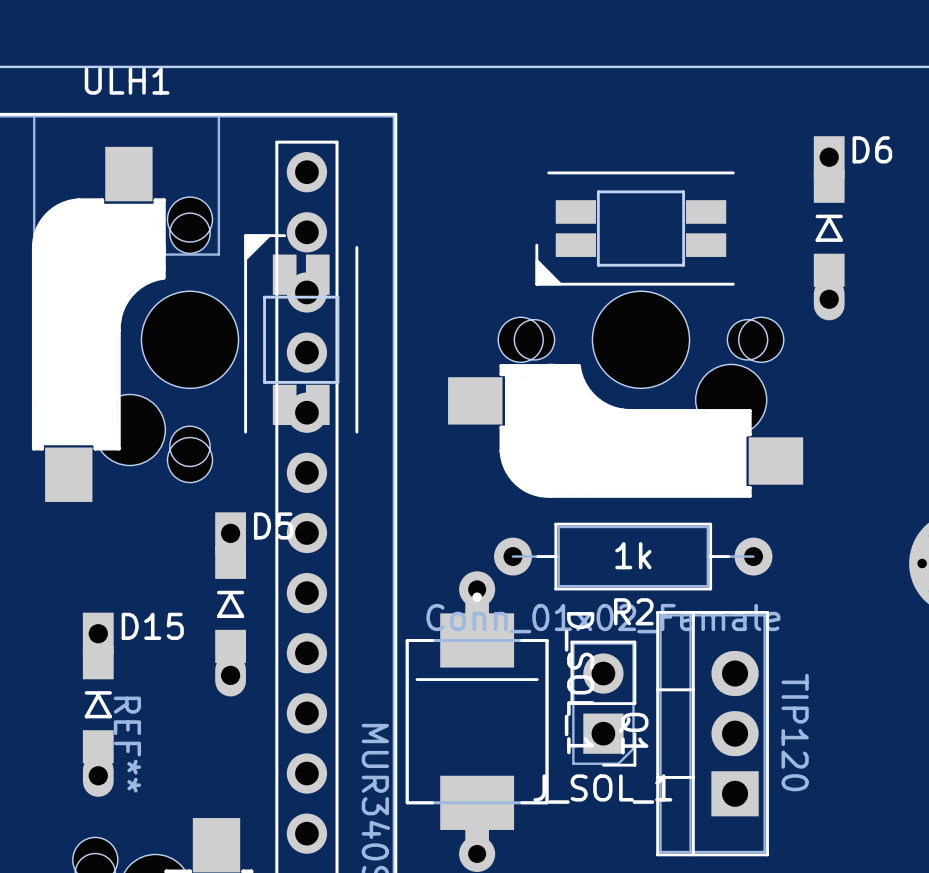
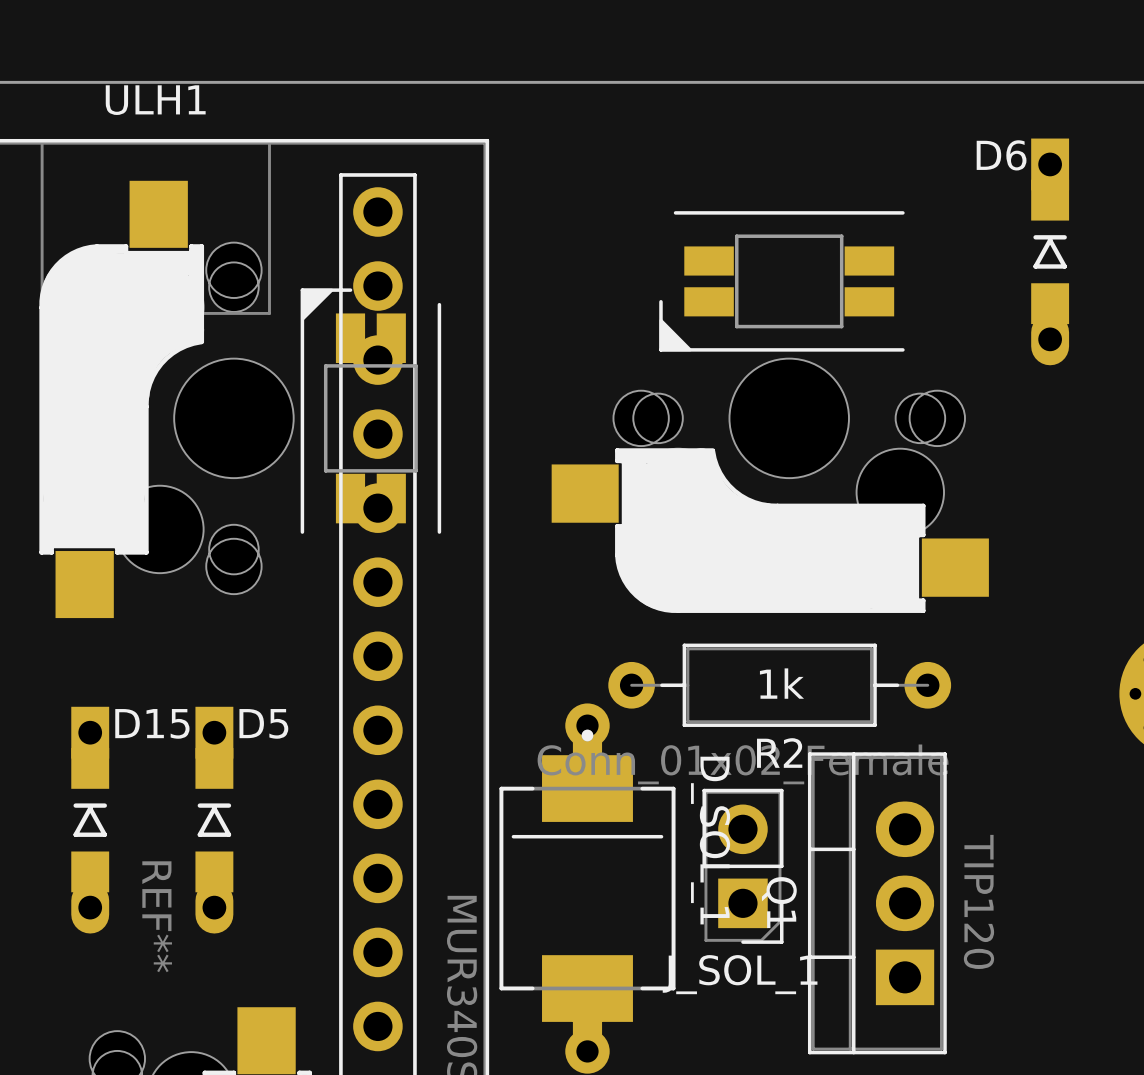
D6 position: (829, 228) -> (1050, 251)
D5 position: (230, 604) -> (214, 820)
D15 position: (98, 704) -> (90, 820)

